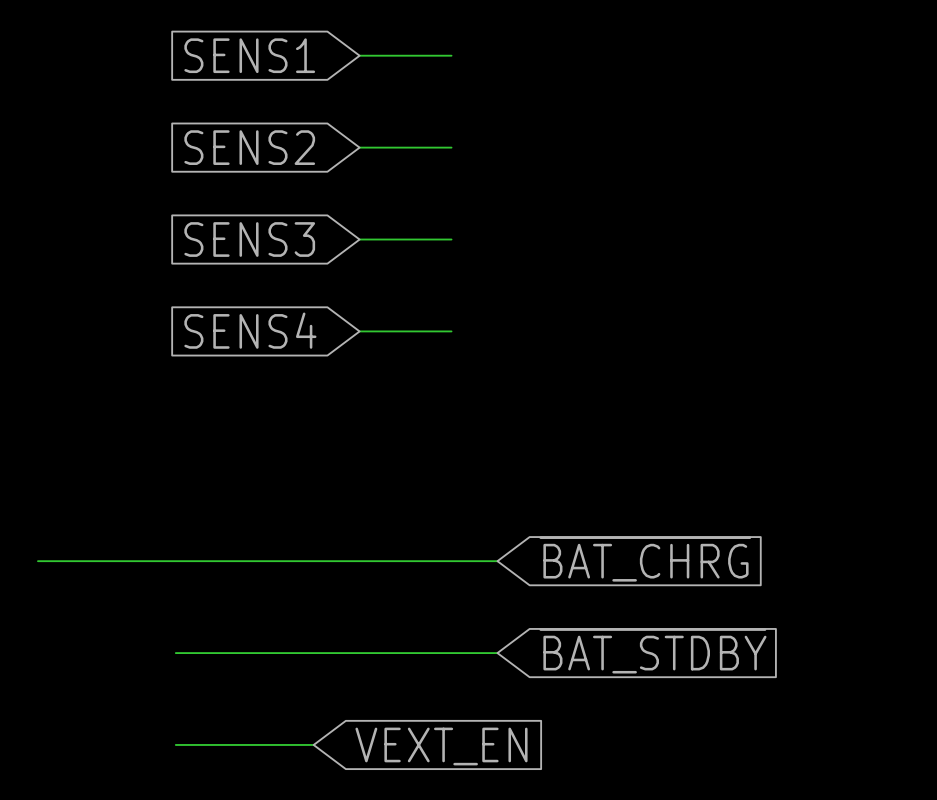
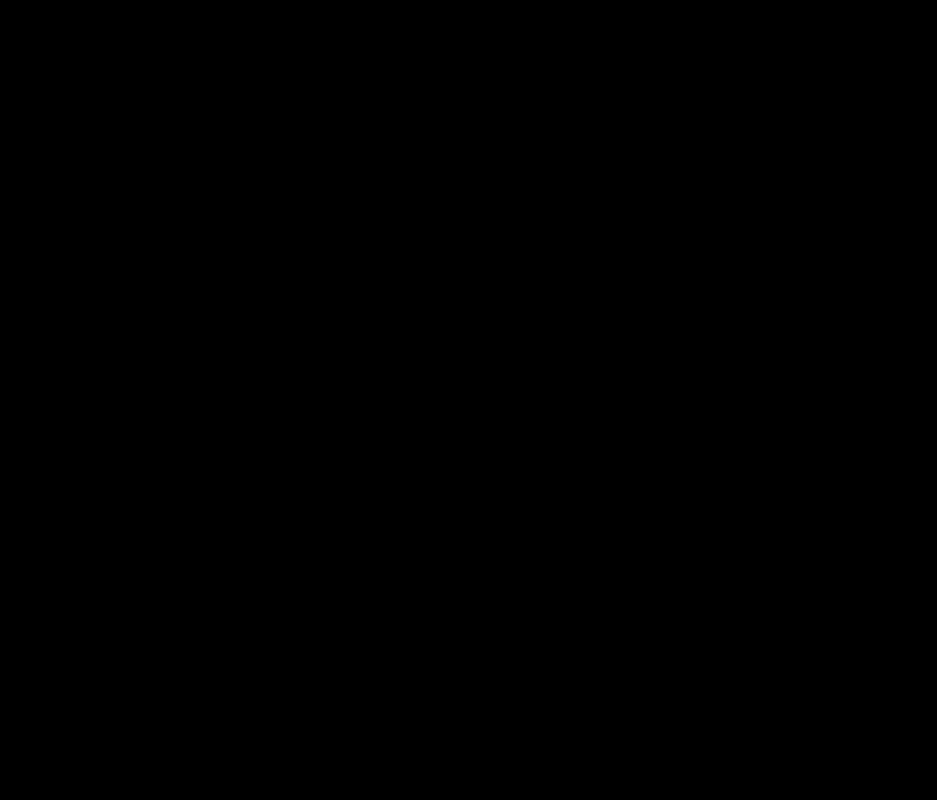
global label: SENS1 (249, 55) -> none
wire: (359, 55) (451, 55) -> none
global label: SENS2 (249, 147) -> none
wire: (359, 147) (451, 147) -> none
global label: SENS3 (249, 239) -> none
wire: (359, 239) (451, 239) -> none
global label: SENS4 (250, 330) -> none
wire: (359, 331) (451, 331) -> none
global label: ~{BAT_CHRG} (645, 559) -> none
wire: (37, 561) (497, 561) -> none
global label: ~{BAT_STDBY} (652, 650) -> none
wire: (175, 653) (497, 653) -> none
wire: (175, 744) (313, 744) -> none
global label: VEXT_EN (441, 746) -> none

